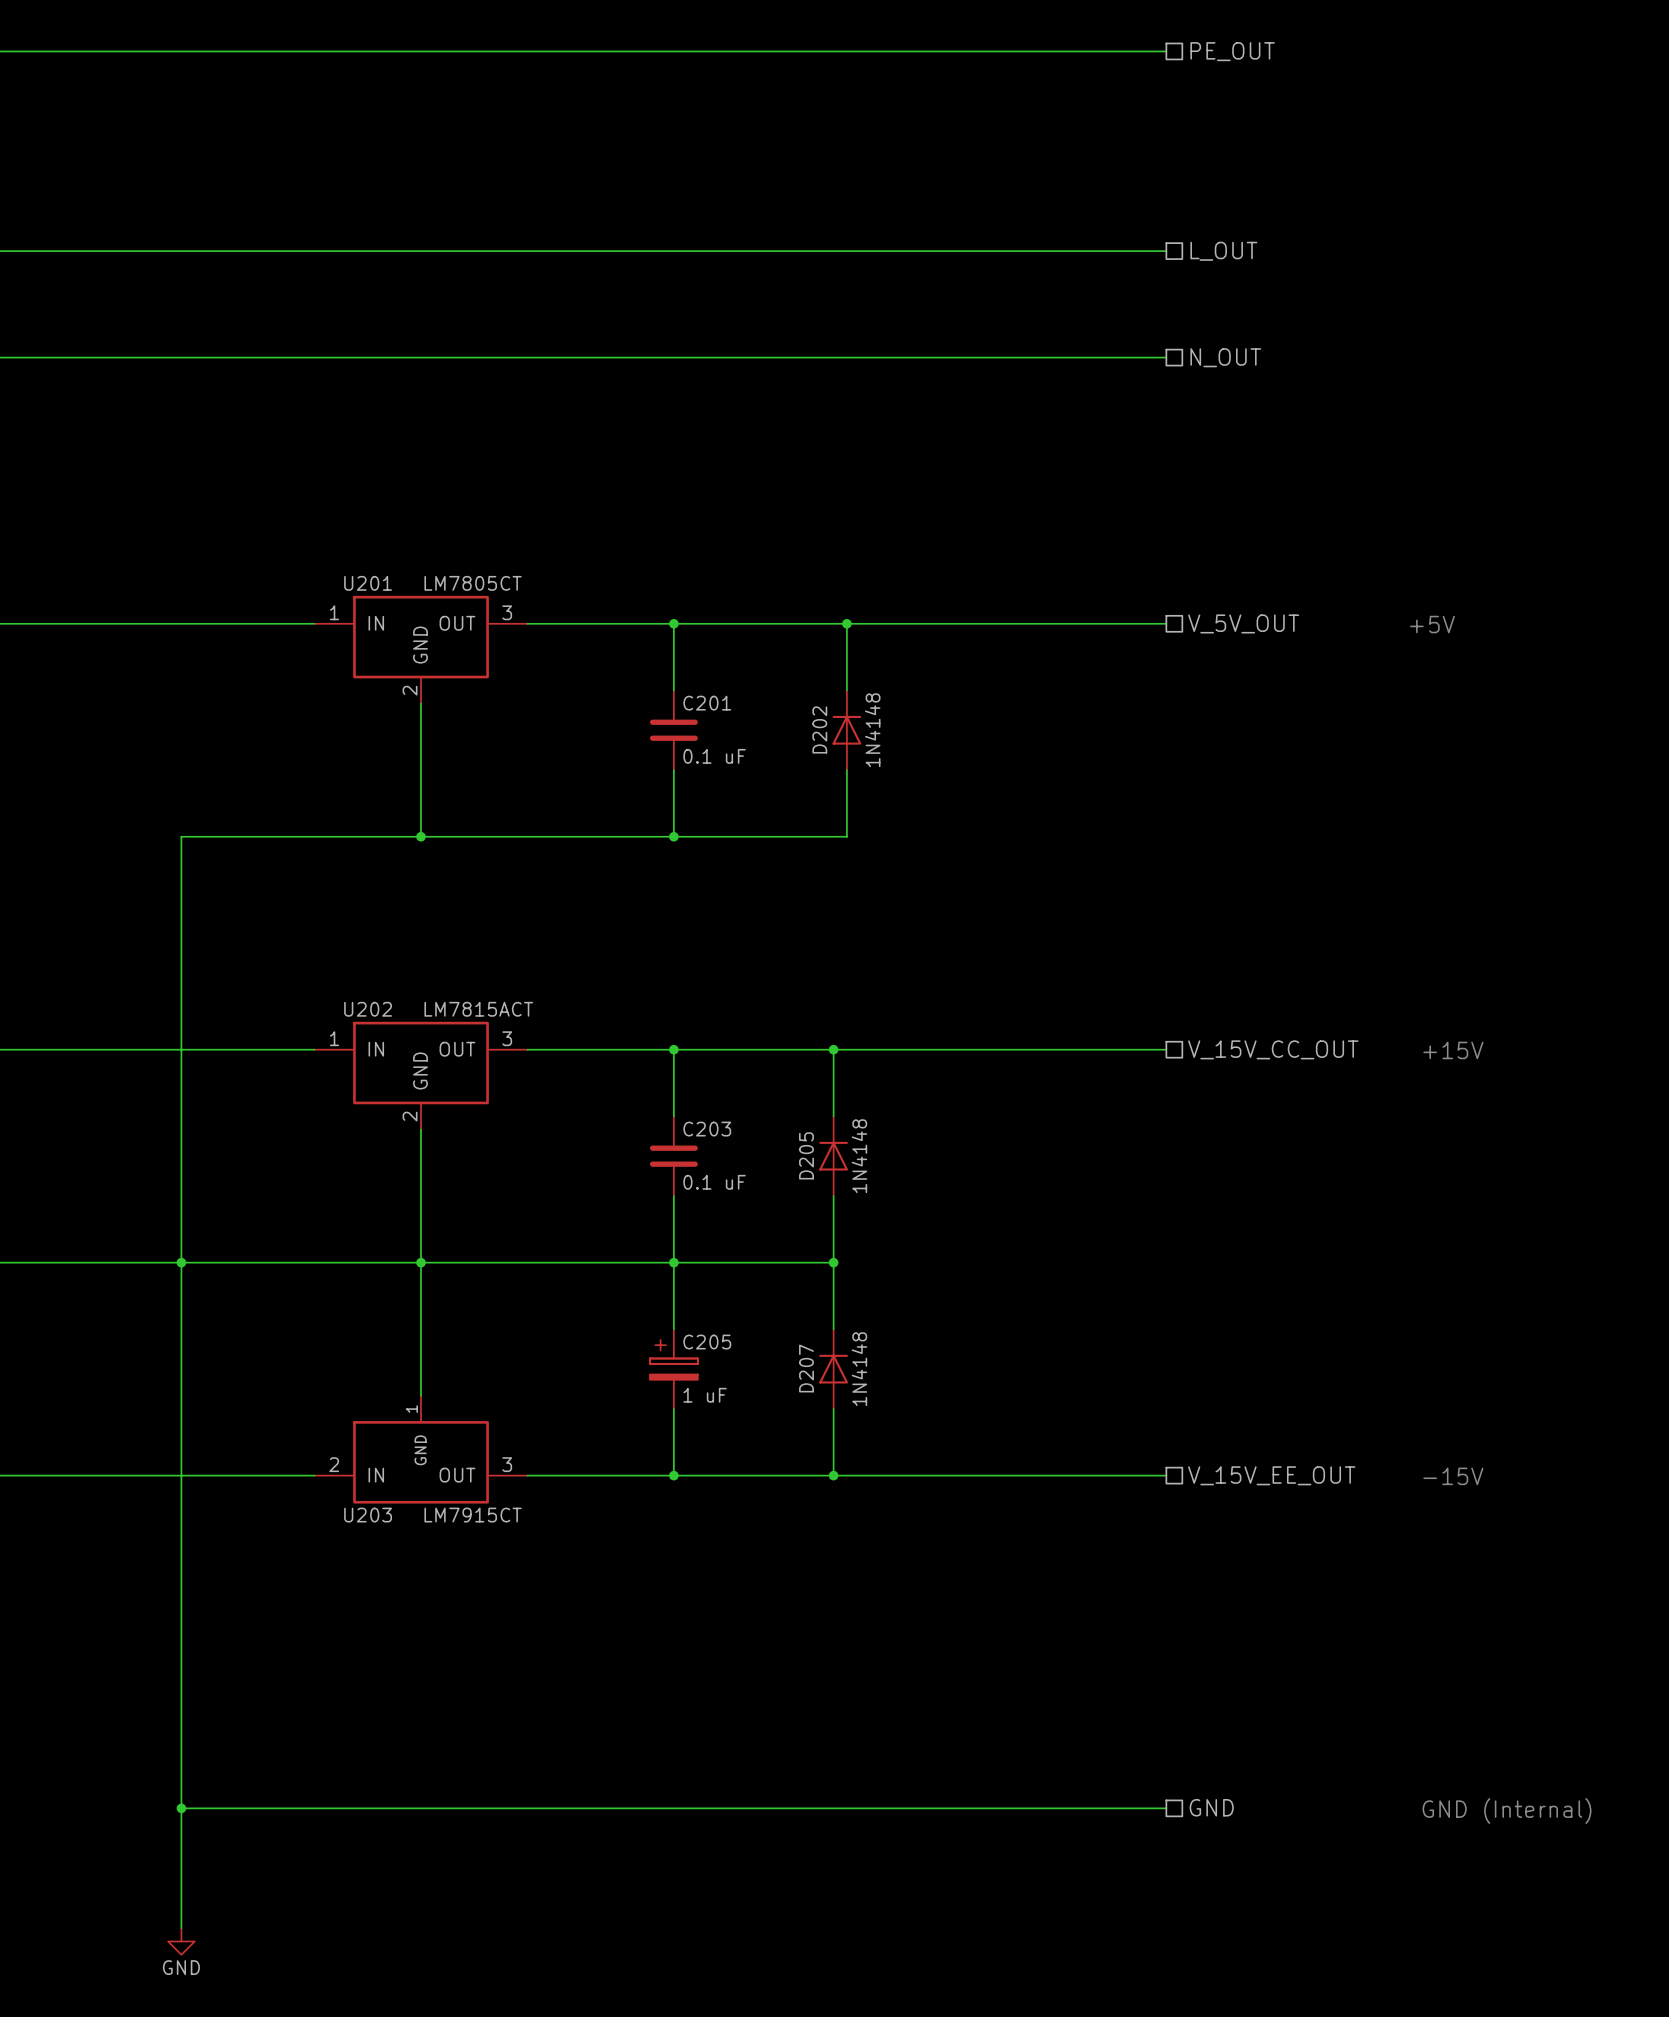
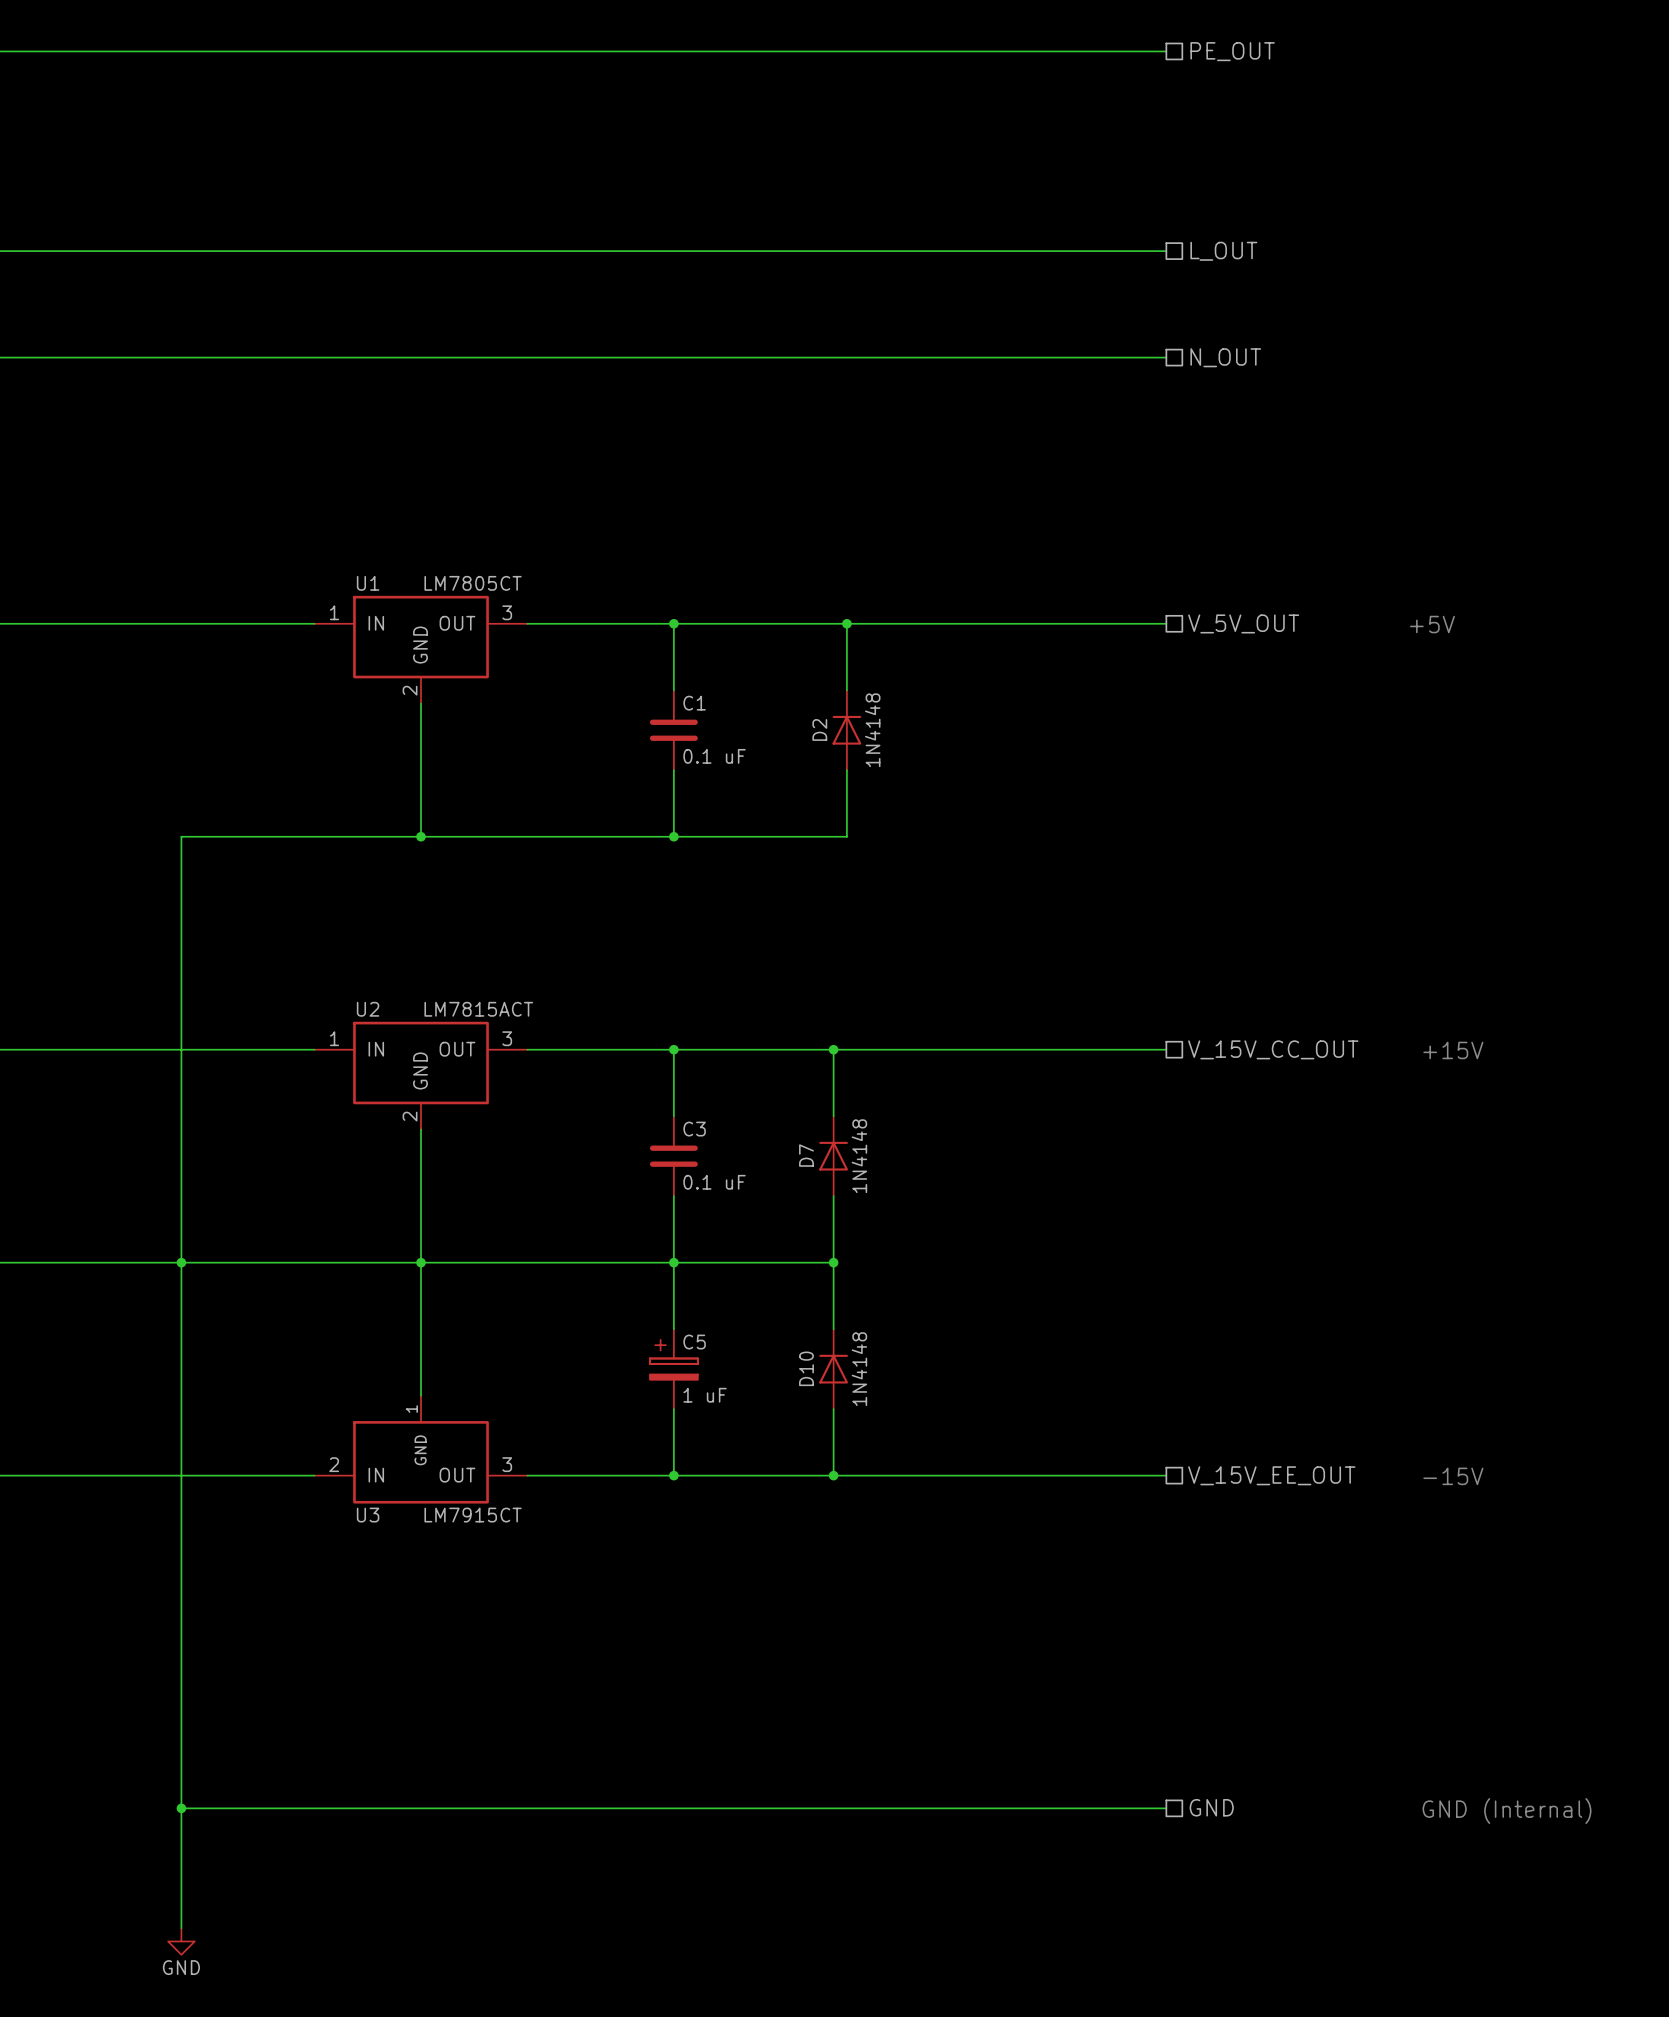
U201 name: U201 (368, 583) -> U1 (368, 583)
C201 name: C201 (707, 703) -> C1 (694, 703)
D202 name: D202 (819, 729) -> D2 (819, 729)
U202 name: U202 (368, 1009) -> U2 (368, 1009)
C203 name: C203 (707, 1129) -> C3 (694, 1129)
D205 name: D205 (806, 1155) -> D7 (806, 1155)
C205 name: C205 (707, 1342) -> C5 (694, 1342)
D207 name: D207 (806, 1368) -> D10 (806, 1368)
U203 name: U203 (368, 1515) -> U3 (368, 1515)

